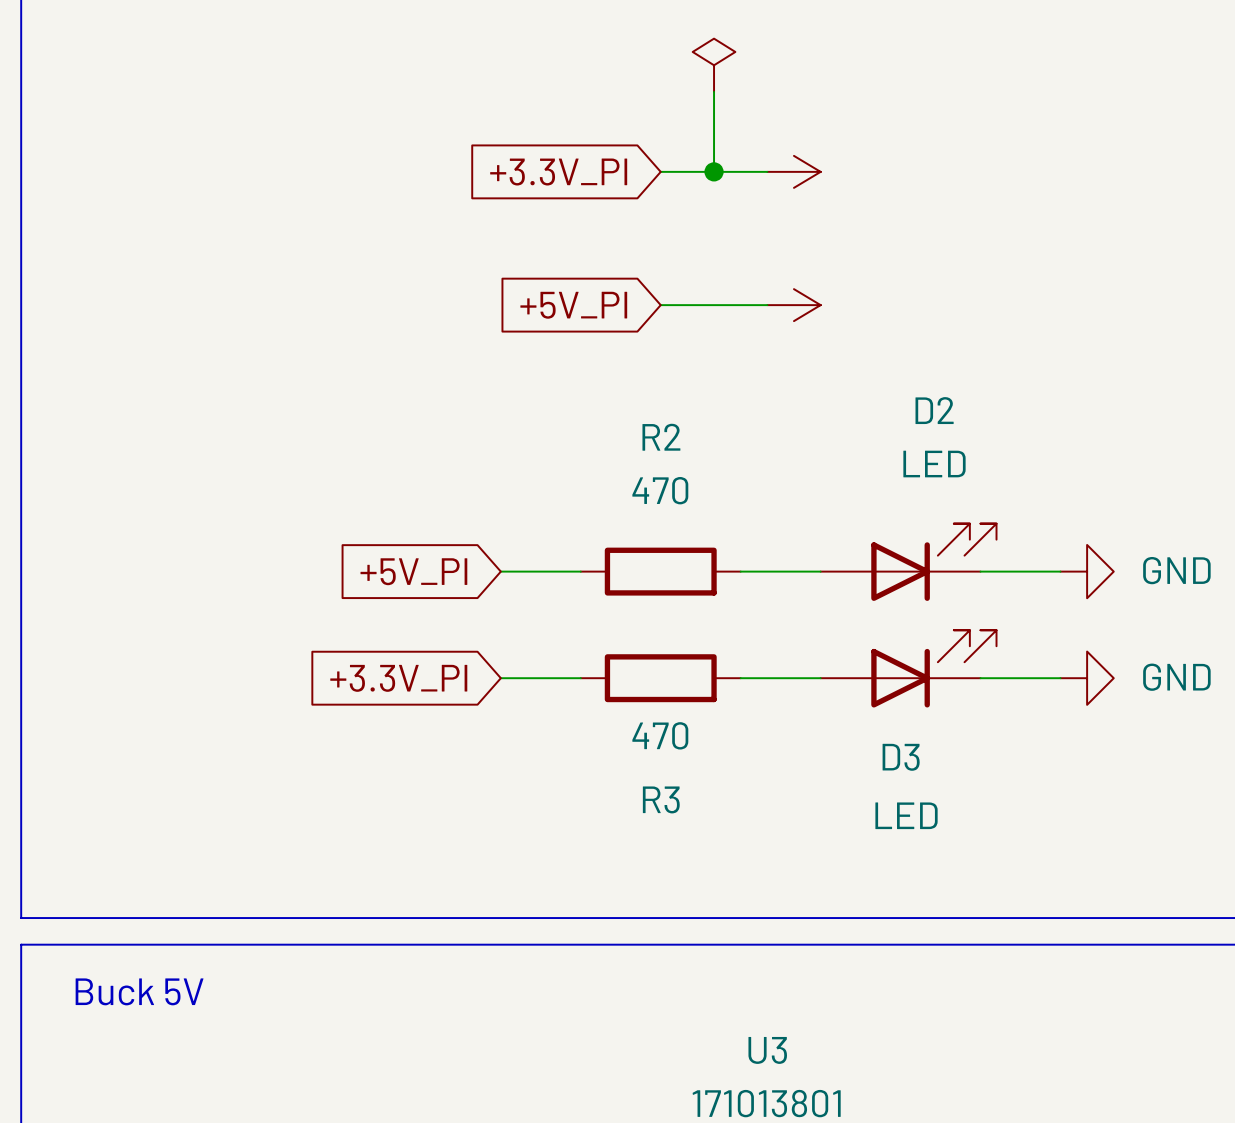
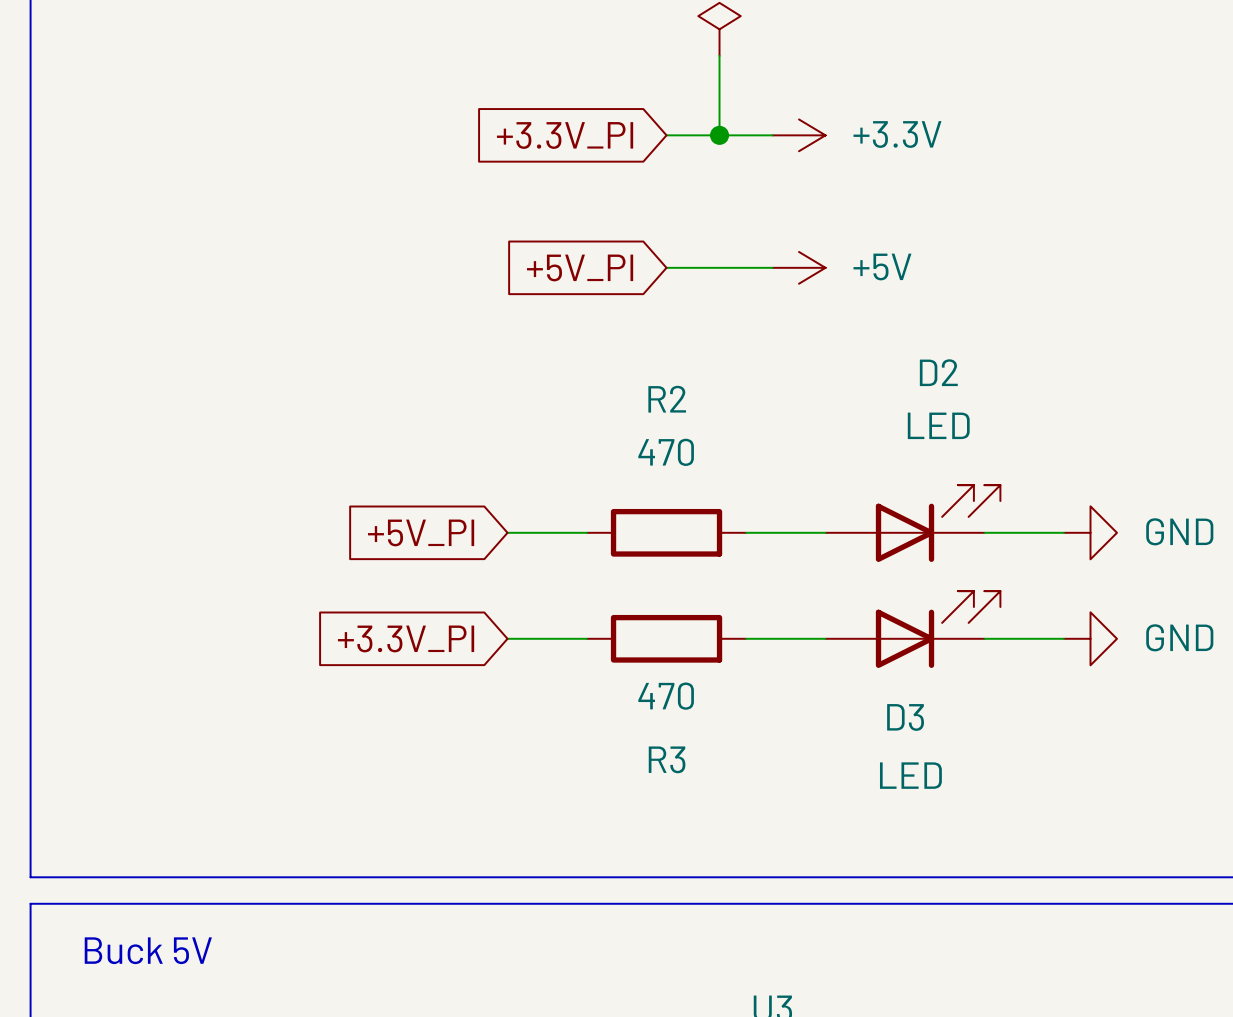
power symbol text: none -> +3.3V (897, 134)
power symbol text: none -> +5V (882, 266)

